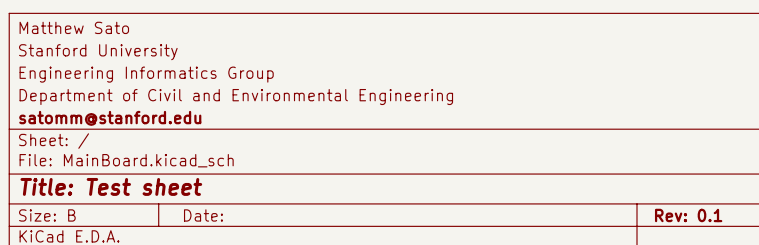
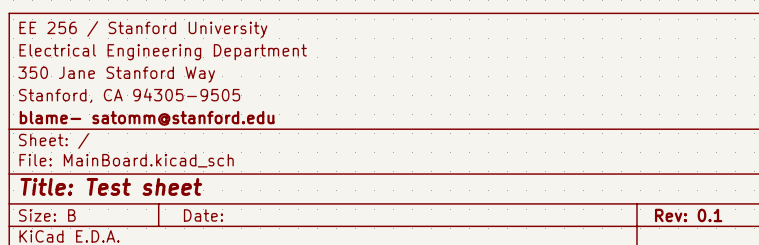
title block: Matthew Sato (74, 27) -> EE 256 / Stanford University (143, 29)
title block: Stanford University (98, 52) -> Electrical Engineering Department (163, 52)
title block: Engineering Informatics Group (146, 74) -> 350 Jane Stanford Way (116, 74)
title block: Department of Civil and Environmental Engineering (236, 97) -> Stanford, CA 94305-9505 (129, 95)
title block: satomm@stanford.edu (110, 118) -> blame- satomm@stanford.edu (147, 118)

